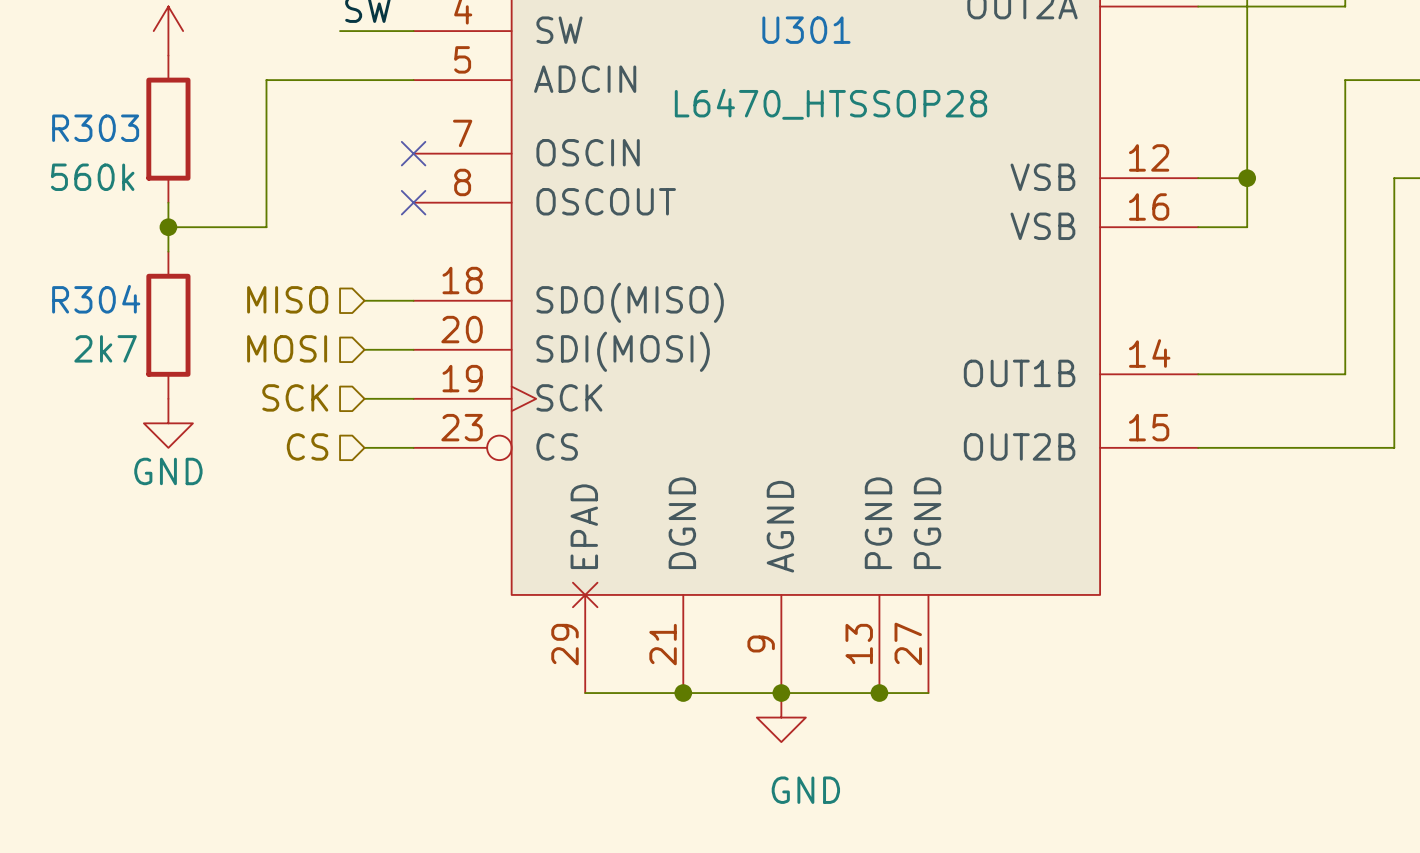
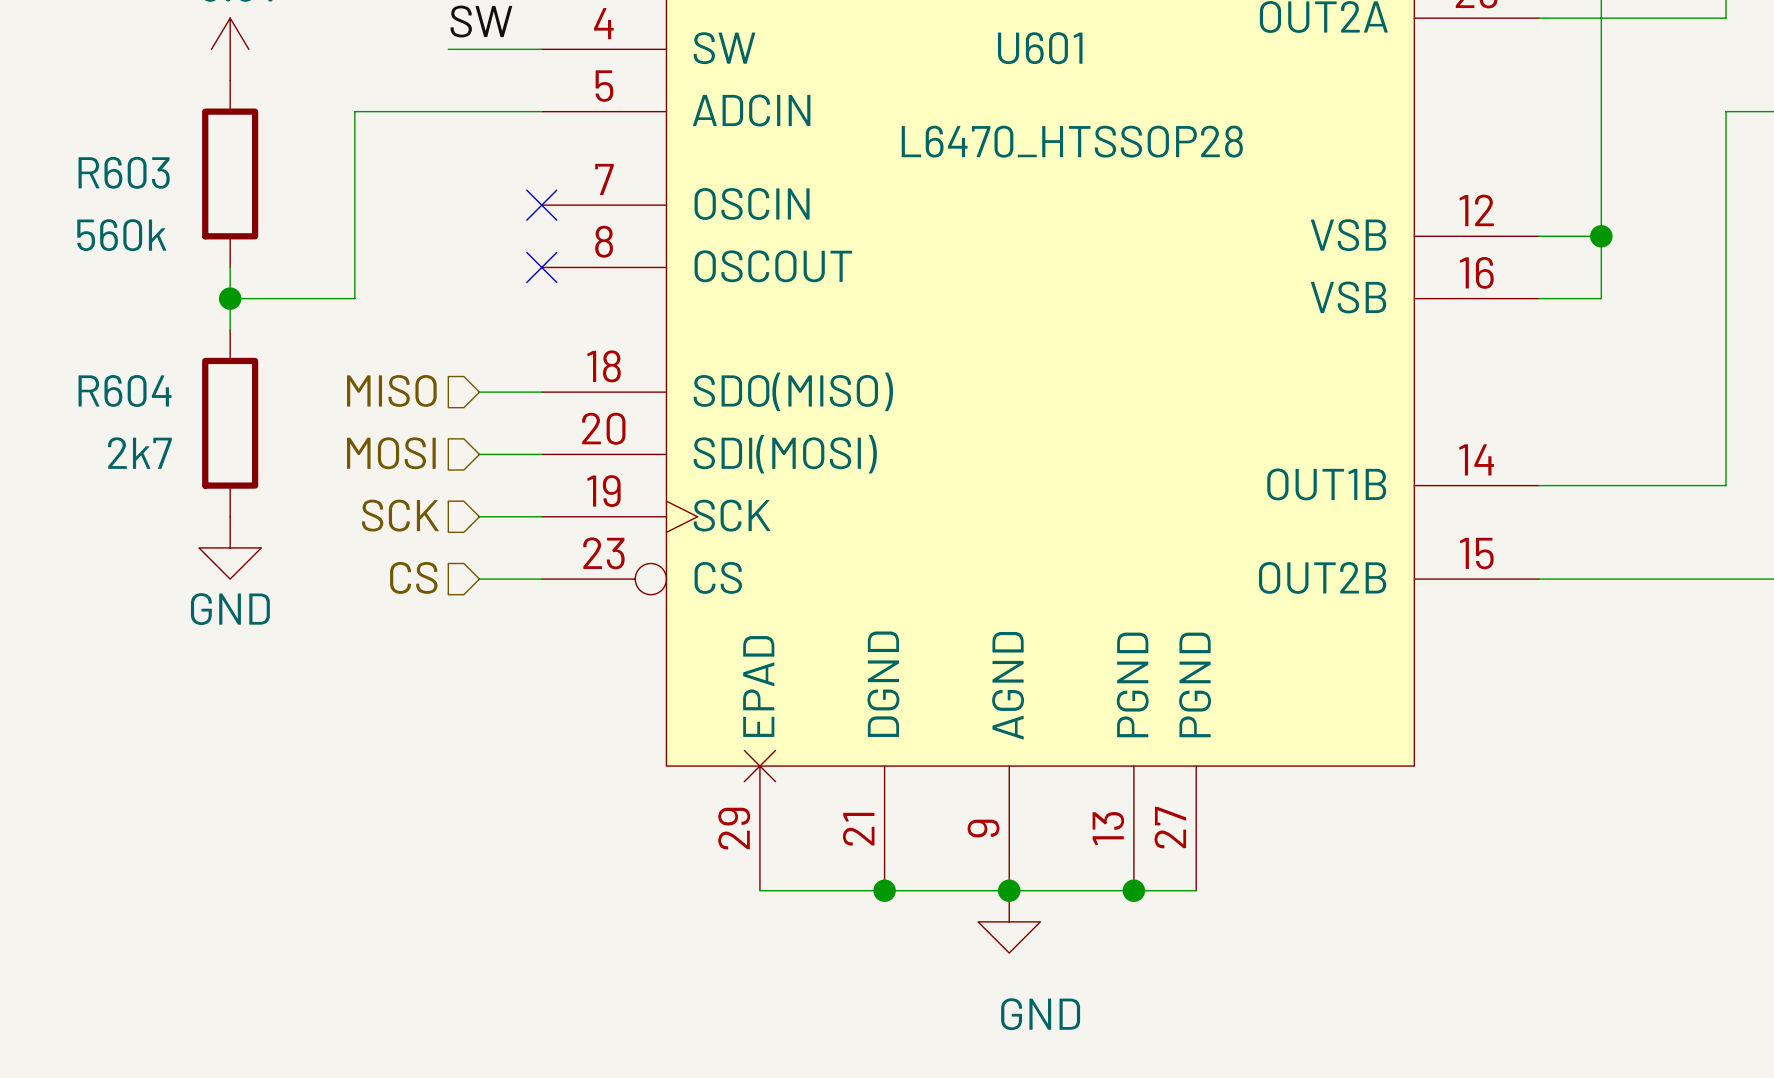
U301 name: U301 (806, 30) -> U601 (1040, 48)
R303 name: R303 (95, 128) -> R603 (124, 172)
R304 name: R304 (96, 299) -> R604 (125, 390)

